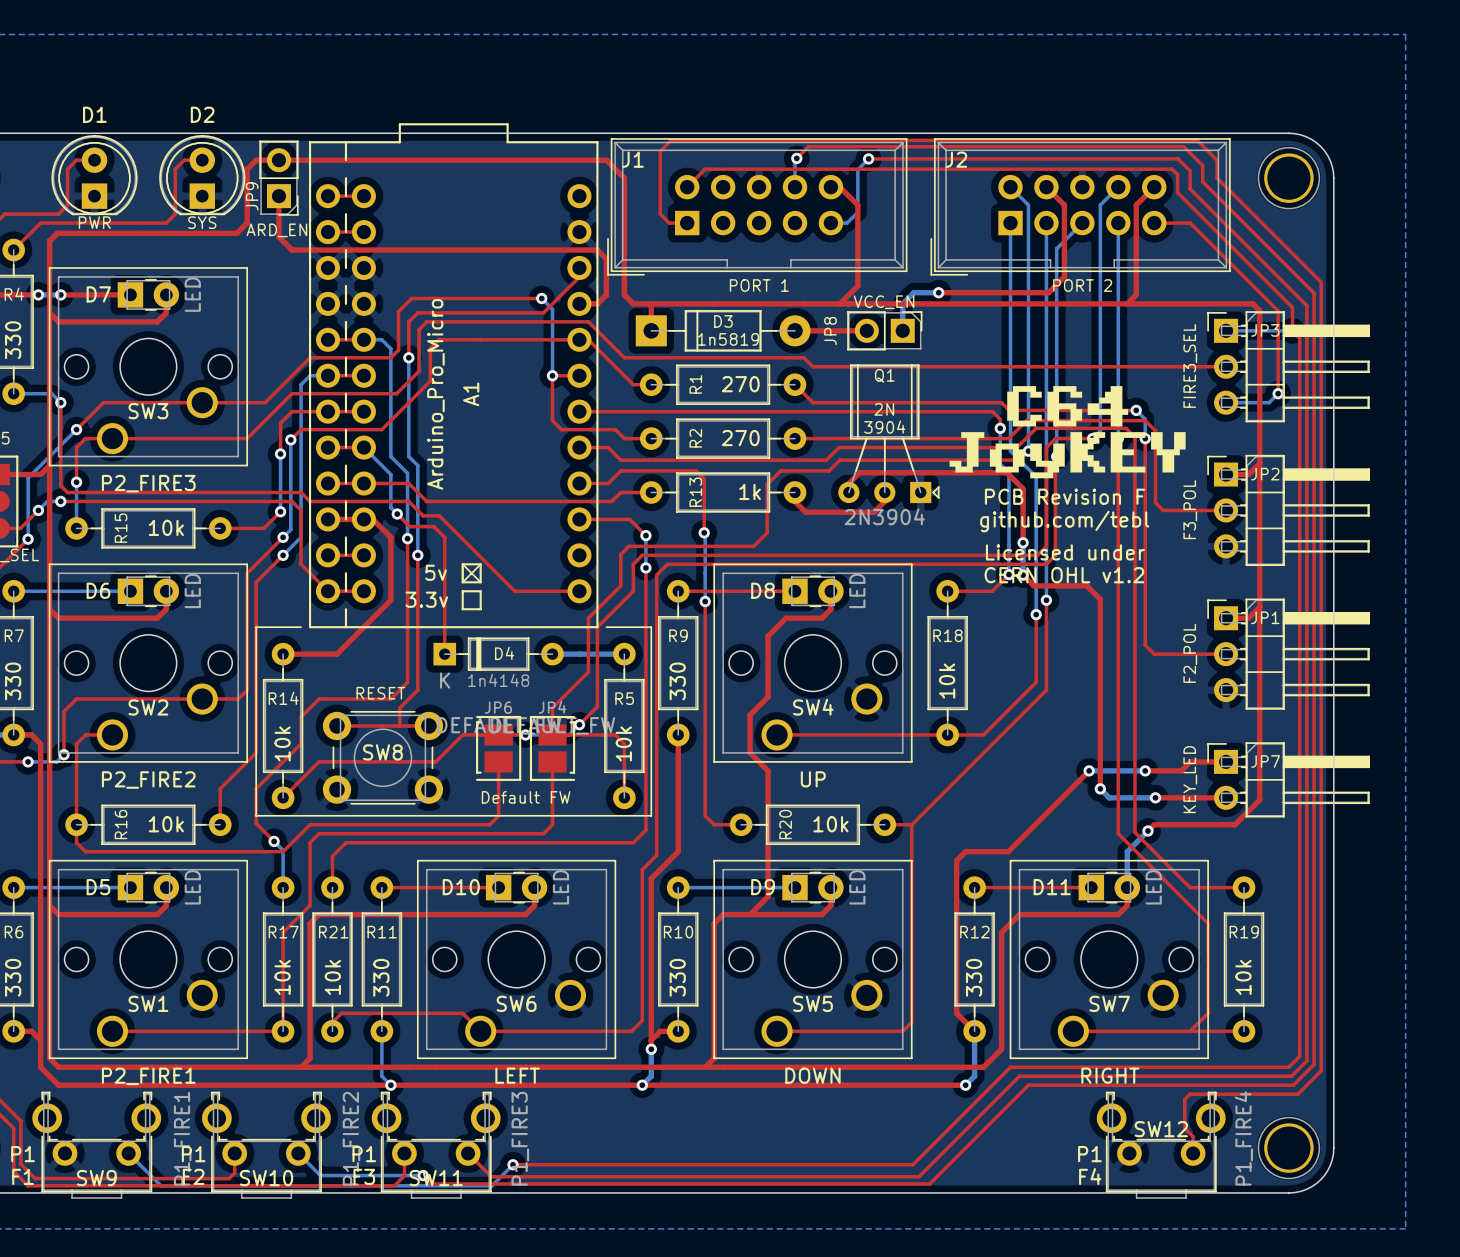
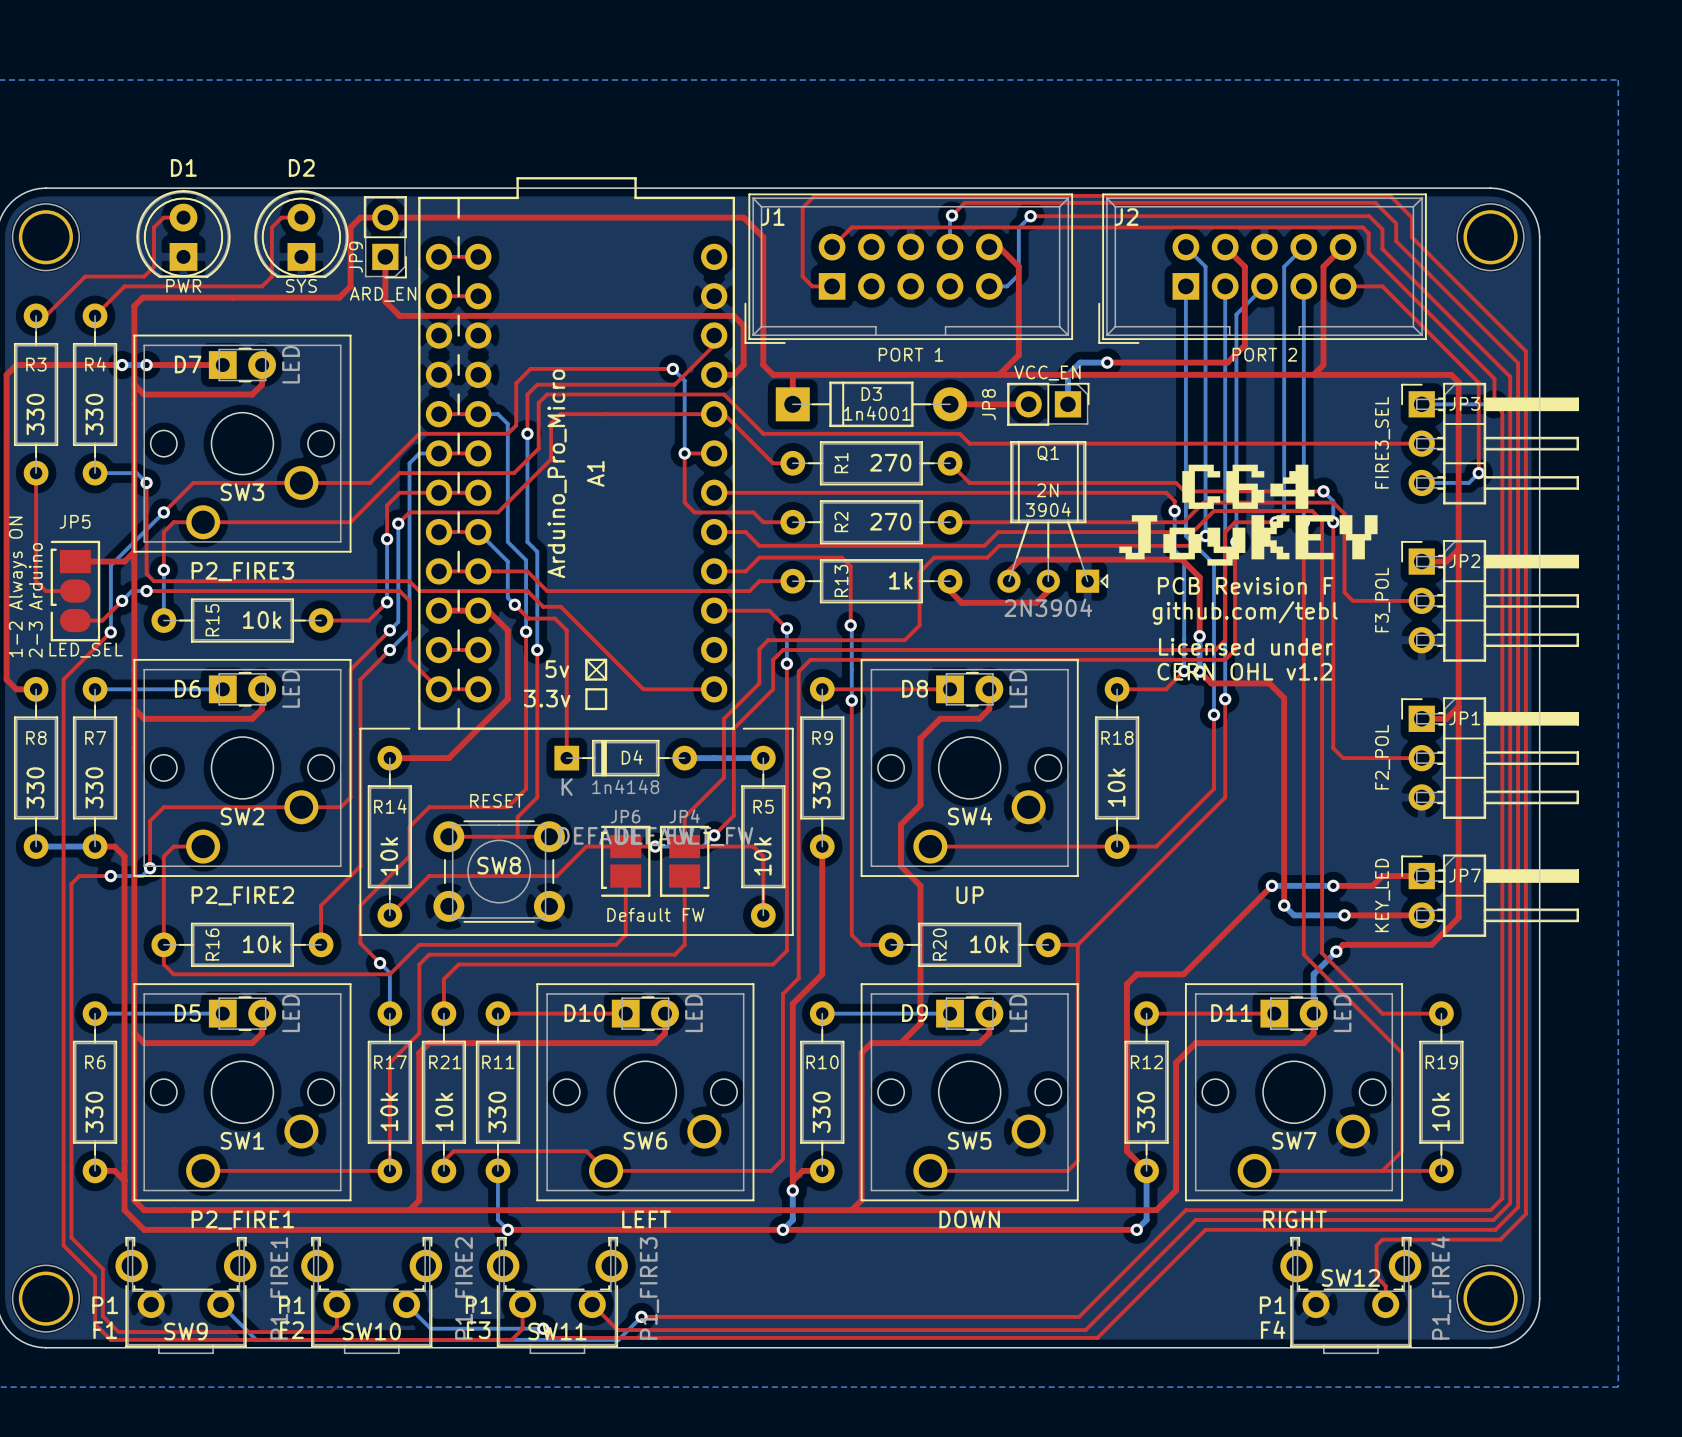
D3 value: 1n5819 (728, 339) -> 1n4001 (877, 413)

